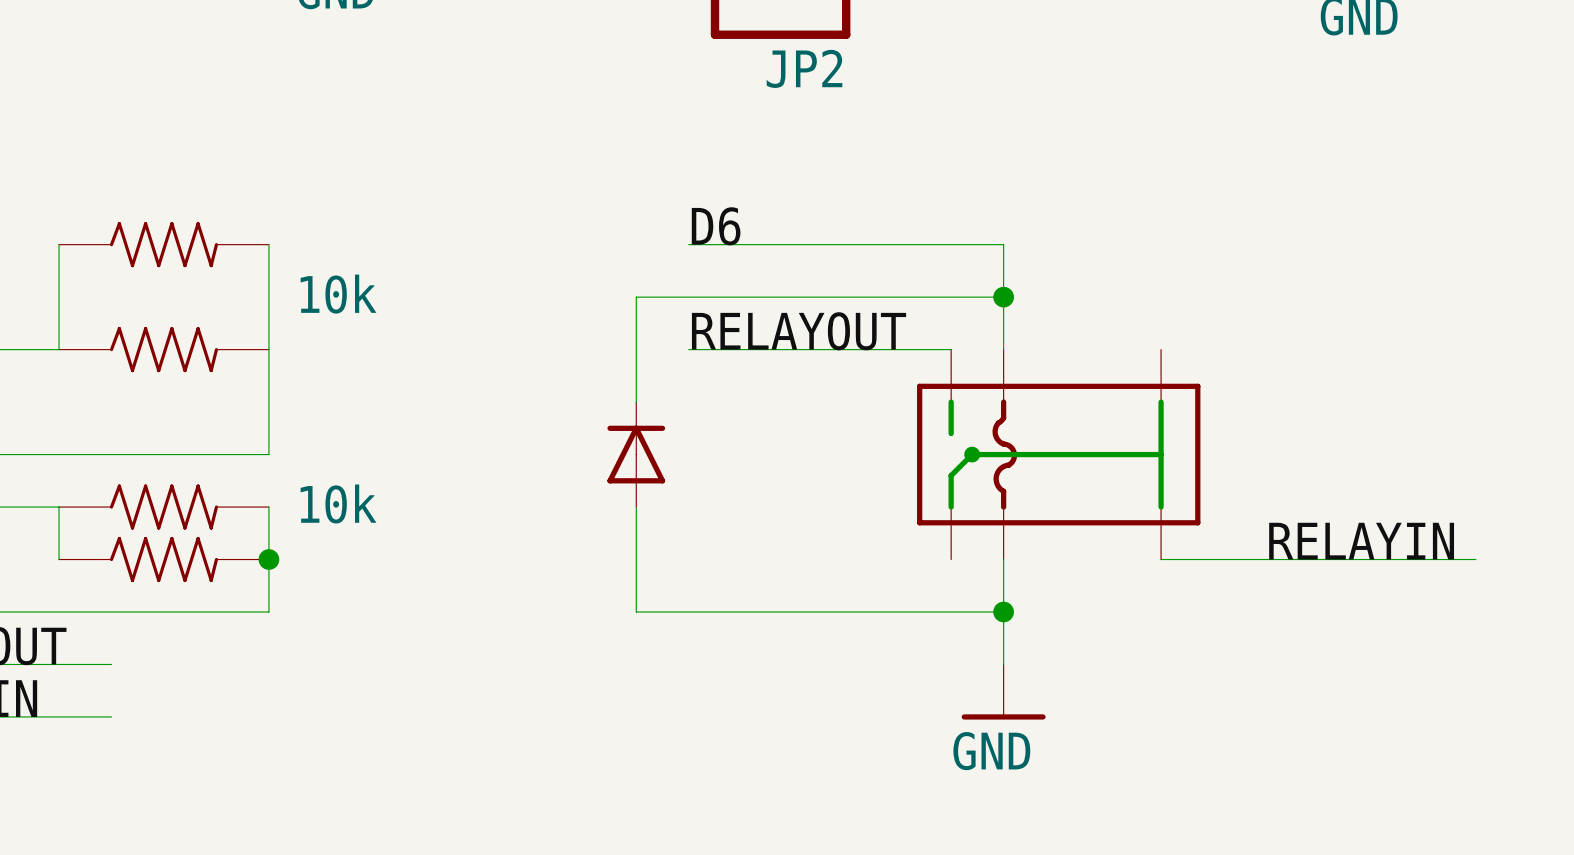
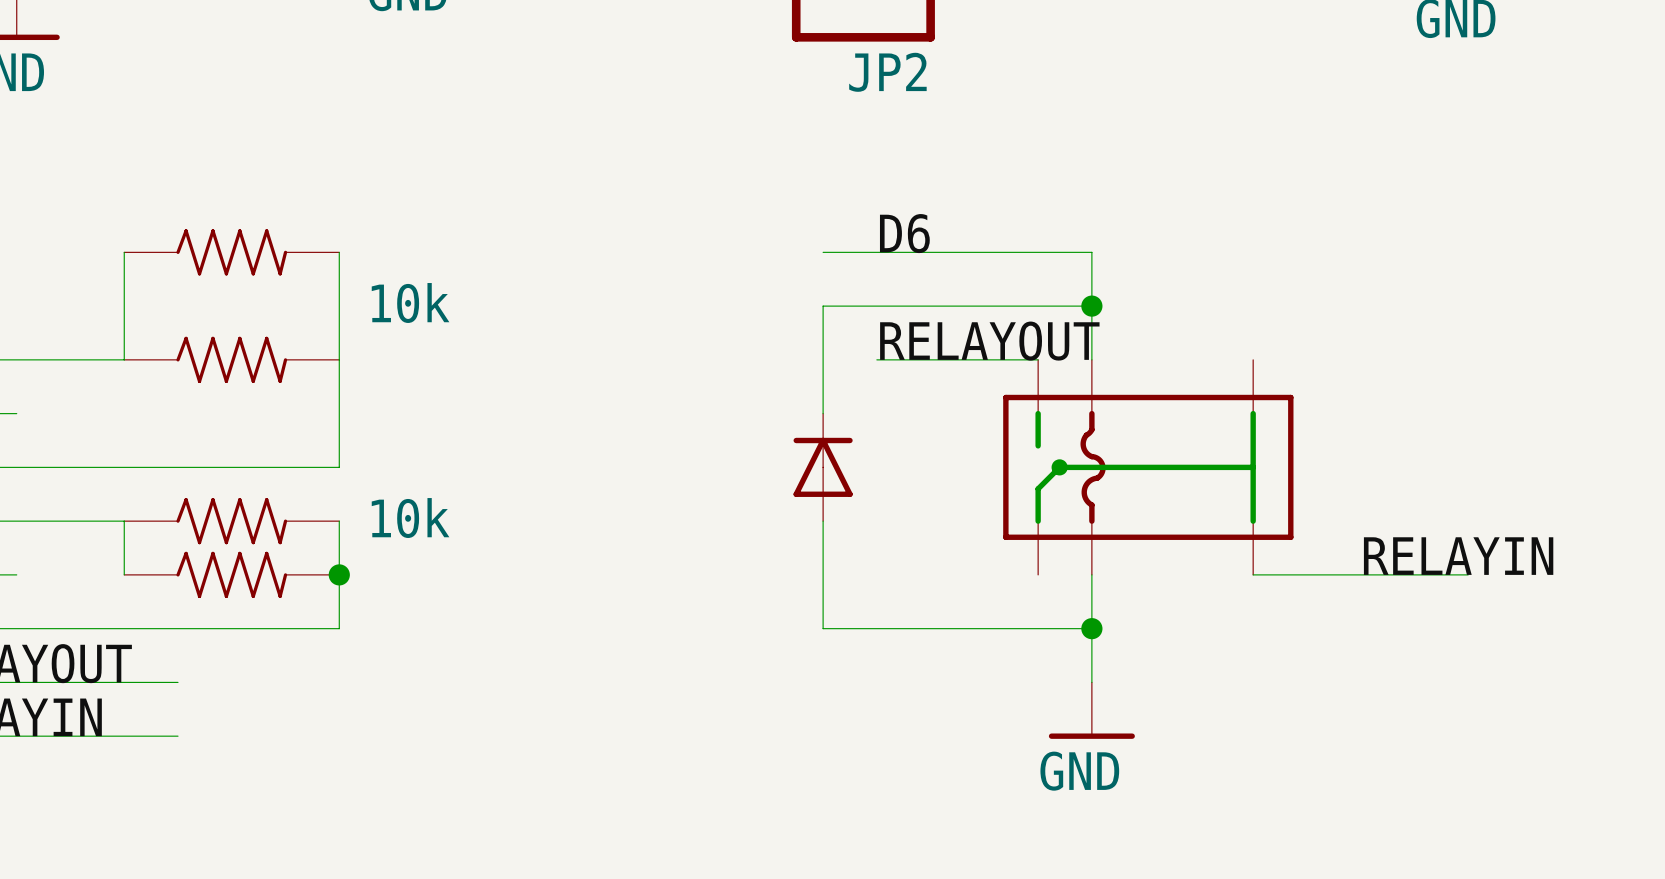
label position: D6 (716, 226) -> D6 (904, 233)
wire: (688, 244) (741, 244) -> none
wire: (741, 297) (636, 297) (636, 402) -> (823, 306) (823, 413)
label position: RELAYOUT (799, 331) -> RELAYOUT (989, 341)
wire: (688, 349) (793, 349) -> none
part position: (636, 454) -> (823, 467)
wire: (636, 507) (636, 611) (741, 611) -> (823, 521) (823, 628)
wire: (1370, 559) (1475, 559) -> none

